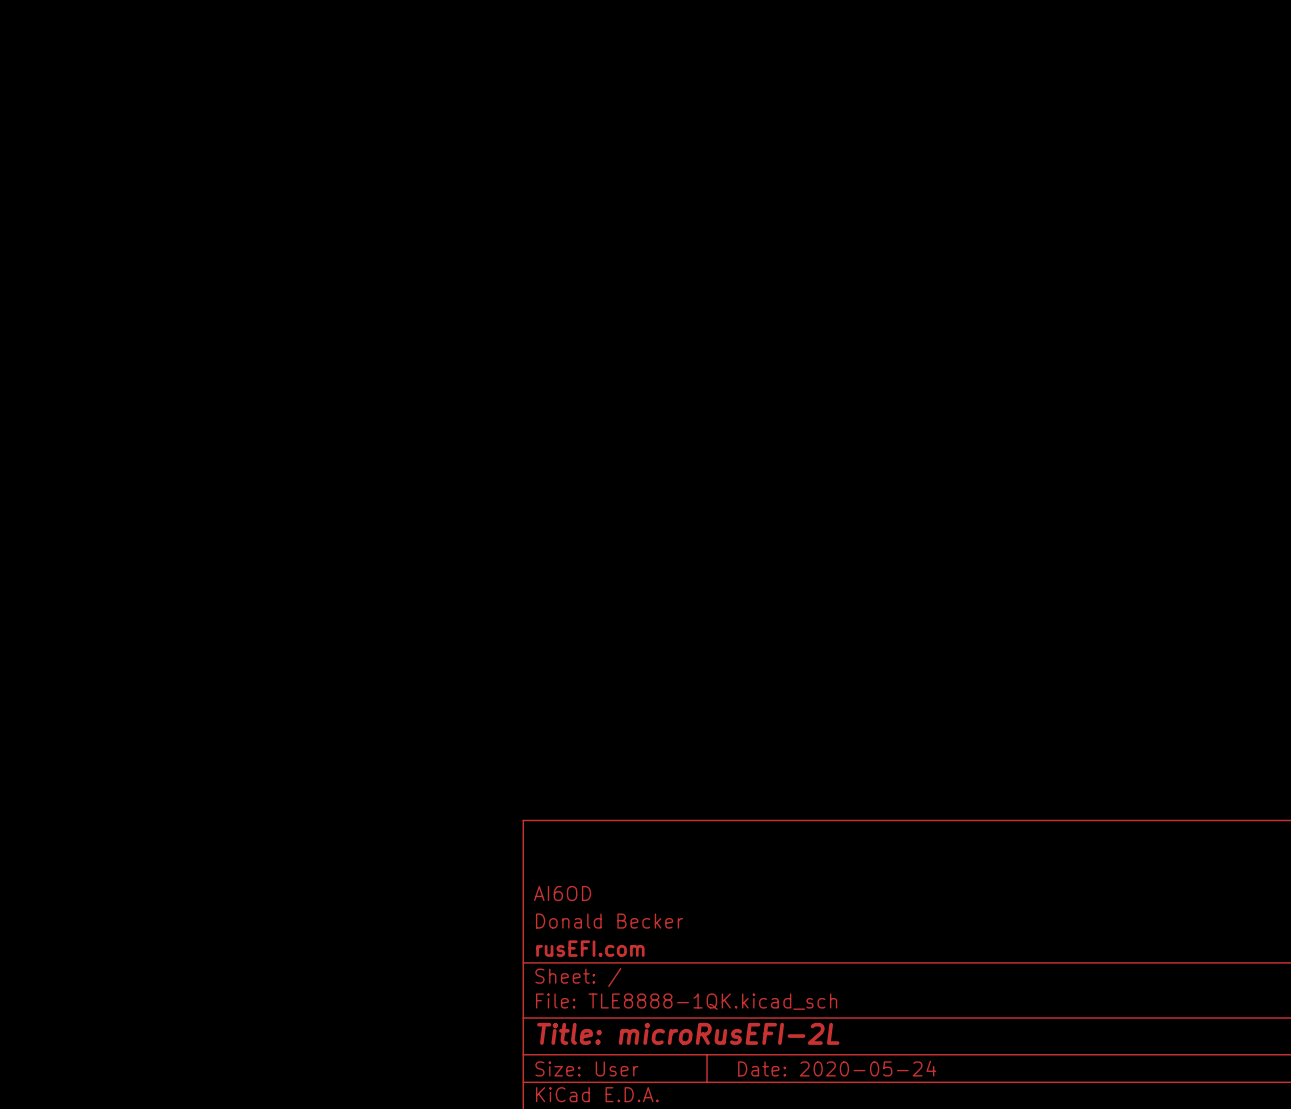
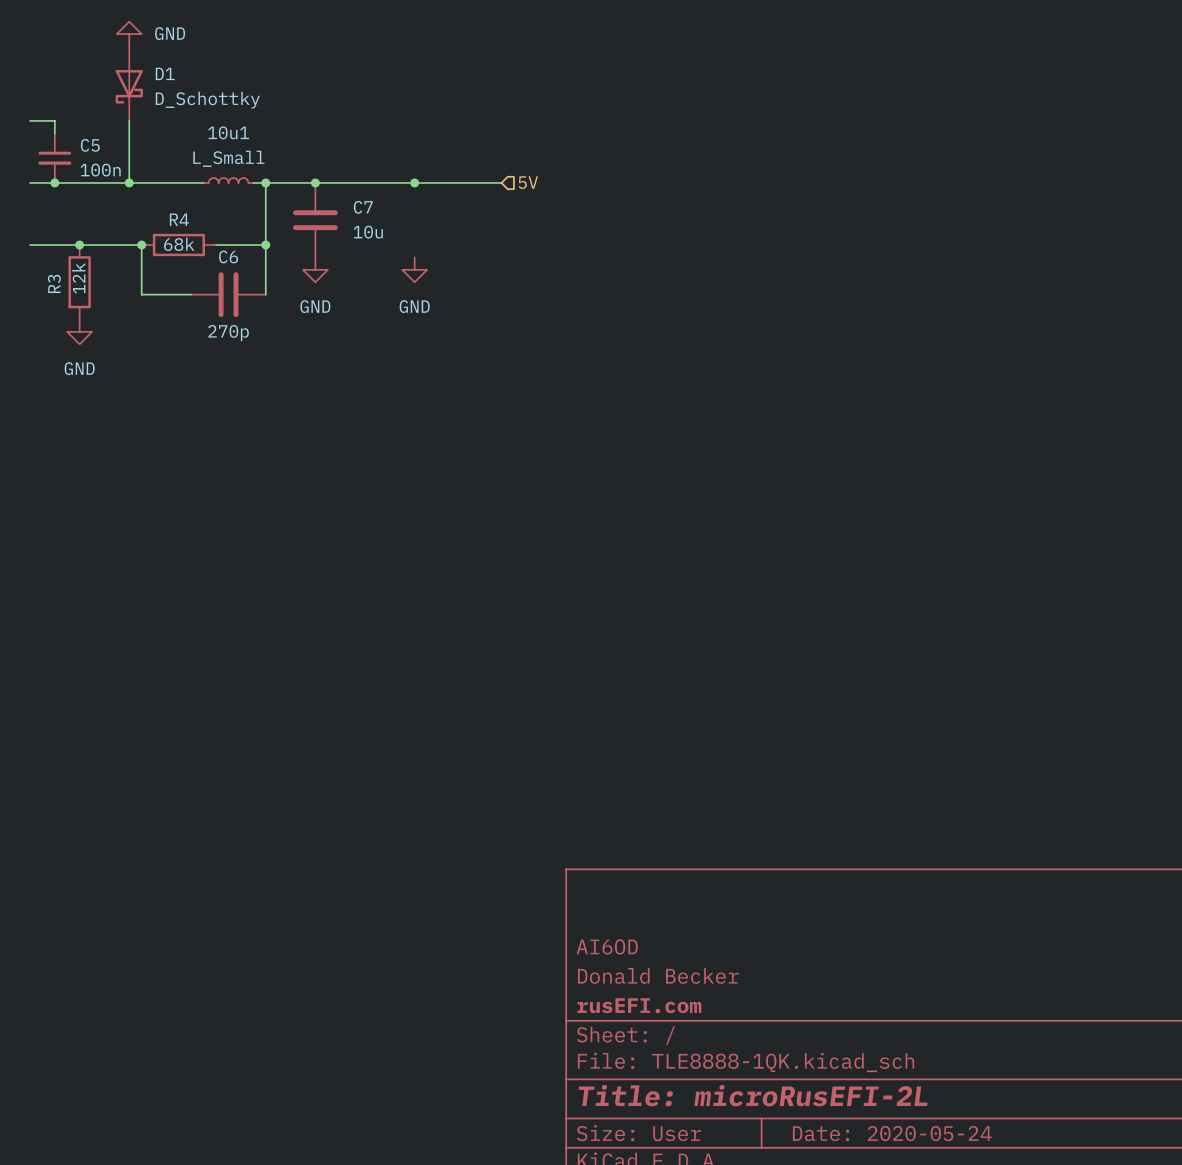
power symbol: none -> GND (129, 34)
D1: none -> D_Schottky (129, 83)
wire: none -> (30, 120) (54, 120) (54, 133)
wire: none -> (129, 120) (129, 182)
C5: none -> 100n (54, 158)
10u1: none -> L_Small (228, 180)
hierarchical label: none -> 5V (528, 182)
wire: none -> (30, 182) (203, 182)
junction: none -> (54, 182)
junction: none -> (129, 182)
wire: none -> (253, 182) (501, 182)
wire: none -> (265, 182) (265, 294)
junction: none -> (265, 182)
junction: none -> (315, 182)
junction: none -> (414, 182)
C7: none -> 10u (315, 220)
wire: none -> (30, 245) (141, 245) (141, 294) (191, 294)
junction: none -> (79, 245)
junction: none -> (141, 245)
R4: none -> 68k (178, 245)
wire: none -> (216, 245) (265, 245)
junction: none -> (265, 245)
power symbol: none -> GND (315, 269)
power symbol: none -> GND (414, 269)
R3: none -> 12k (79, 282)
C6: none -> 270p (228, 294)
power symbol: none -> GND (79, 331)

